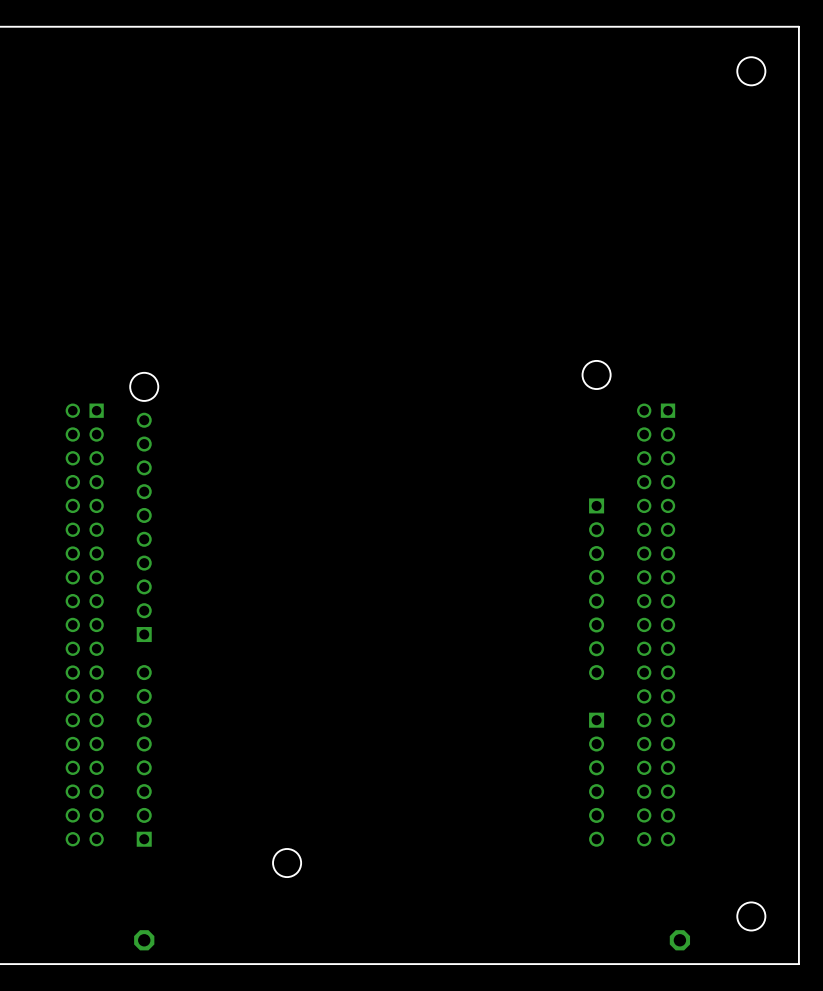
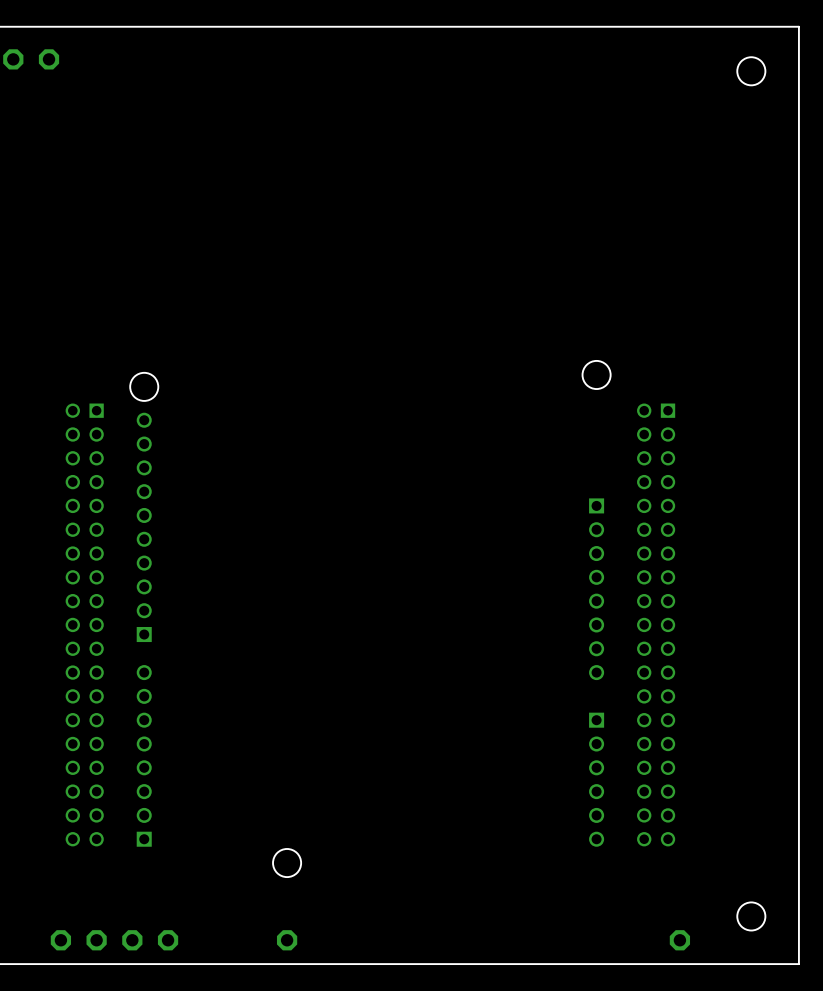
part: none -> (13, 59)
part: none -> (49, 59)
part: none -> (60, 940)
part: none -> (96, 940)
part: none -> (132, 940)
part: (144, 940) -> none
part: none -> (168, 940)
part: none -> (287, 940)

